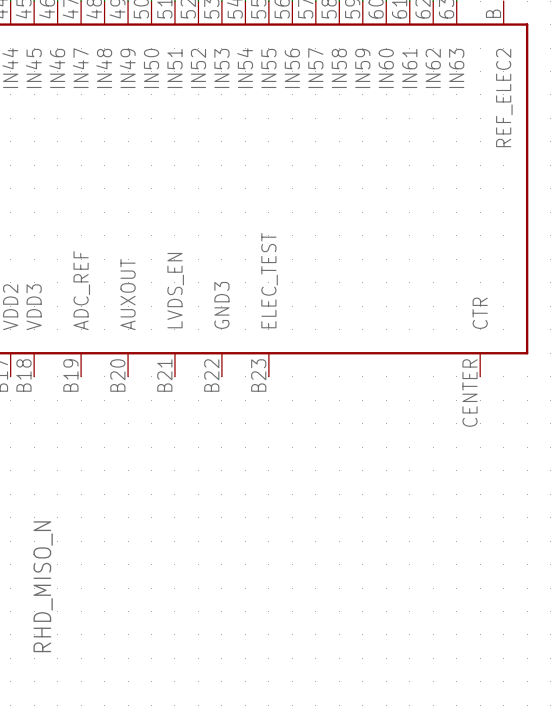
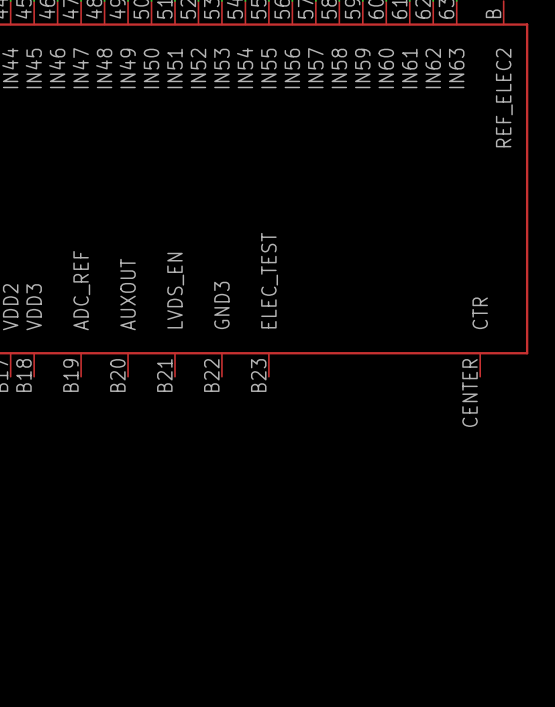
label: RHD_MISO_N (43, 586) -> none

